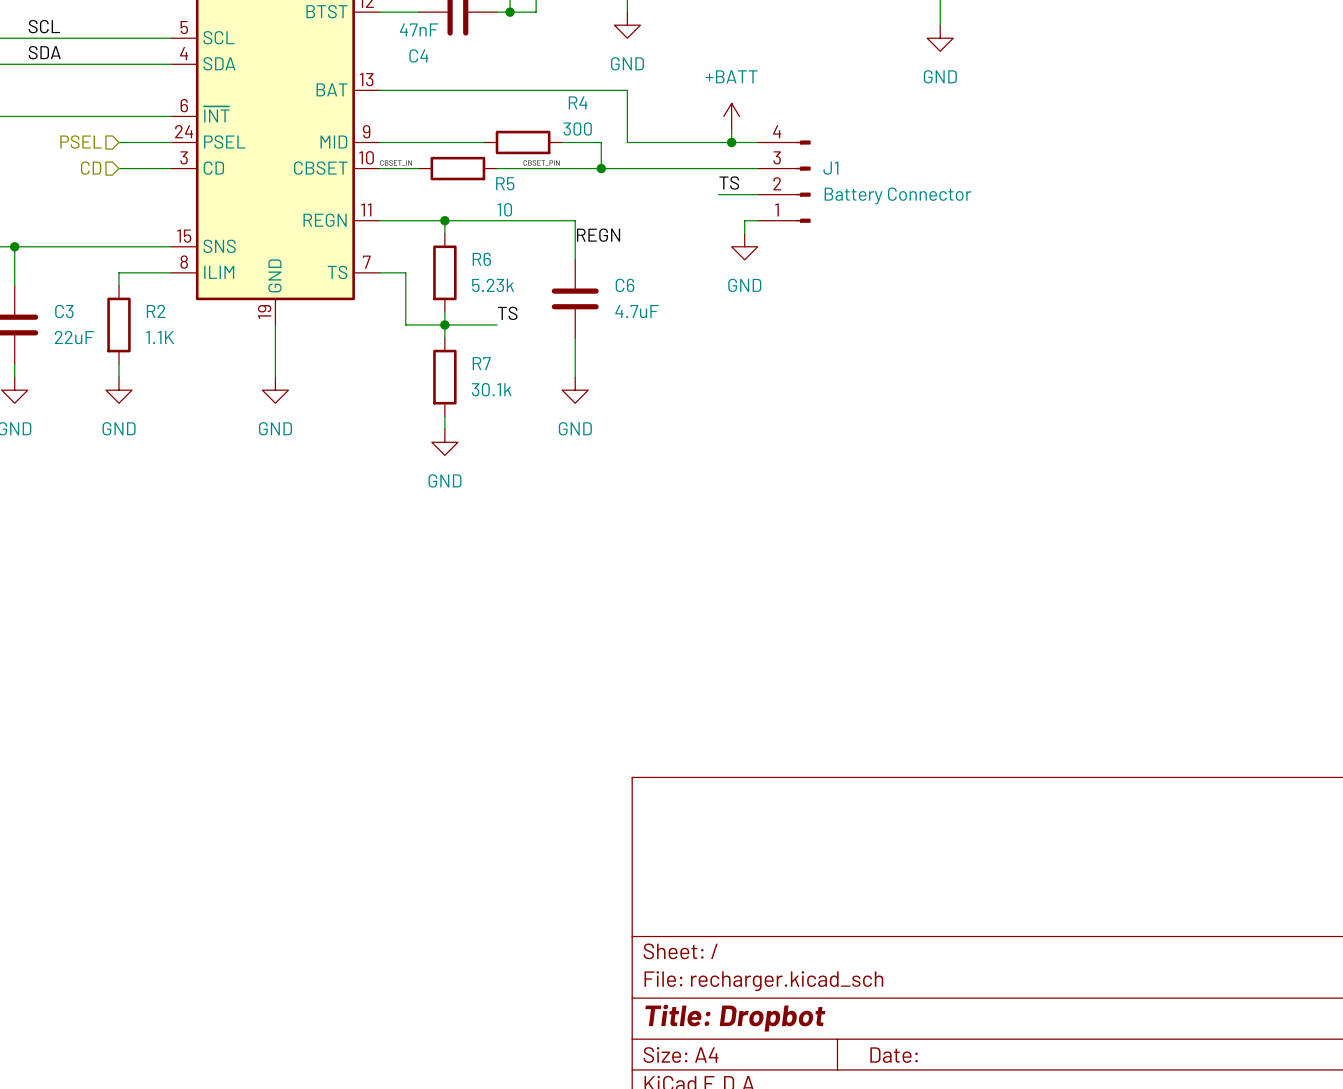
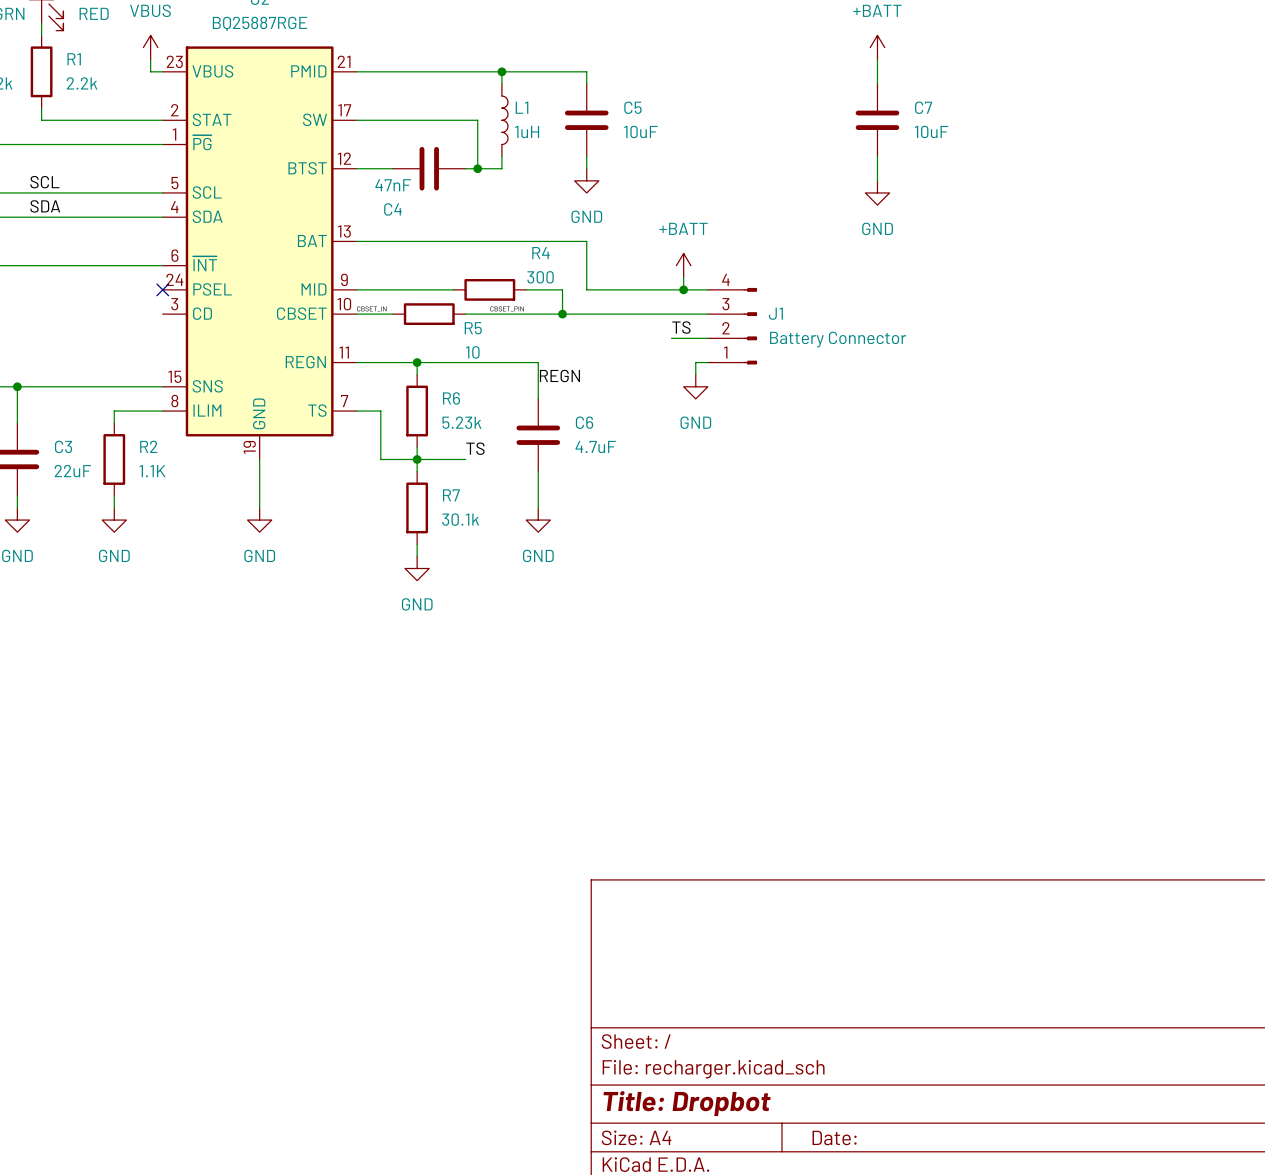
hierarchical label: PSEL (81, 142) -> none
wire: (118, 142) (171, 142) -> none
no-connect mark: none -> (162, 289)
hierarchical label: CD (91, 168) -> none
wire: (118, 168) (171, 168) -> none

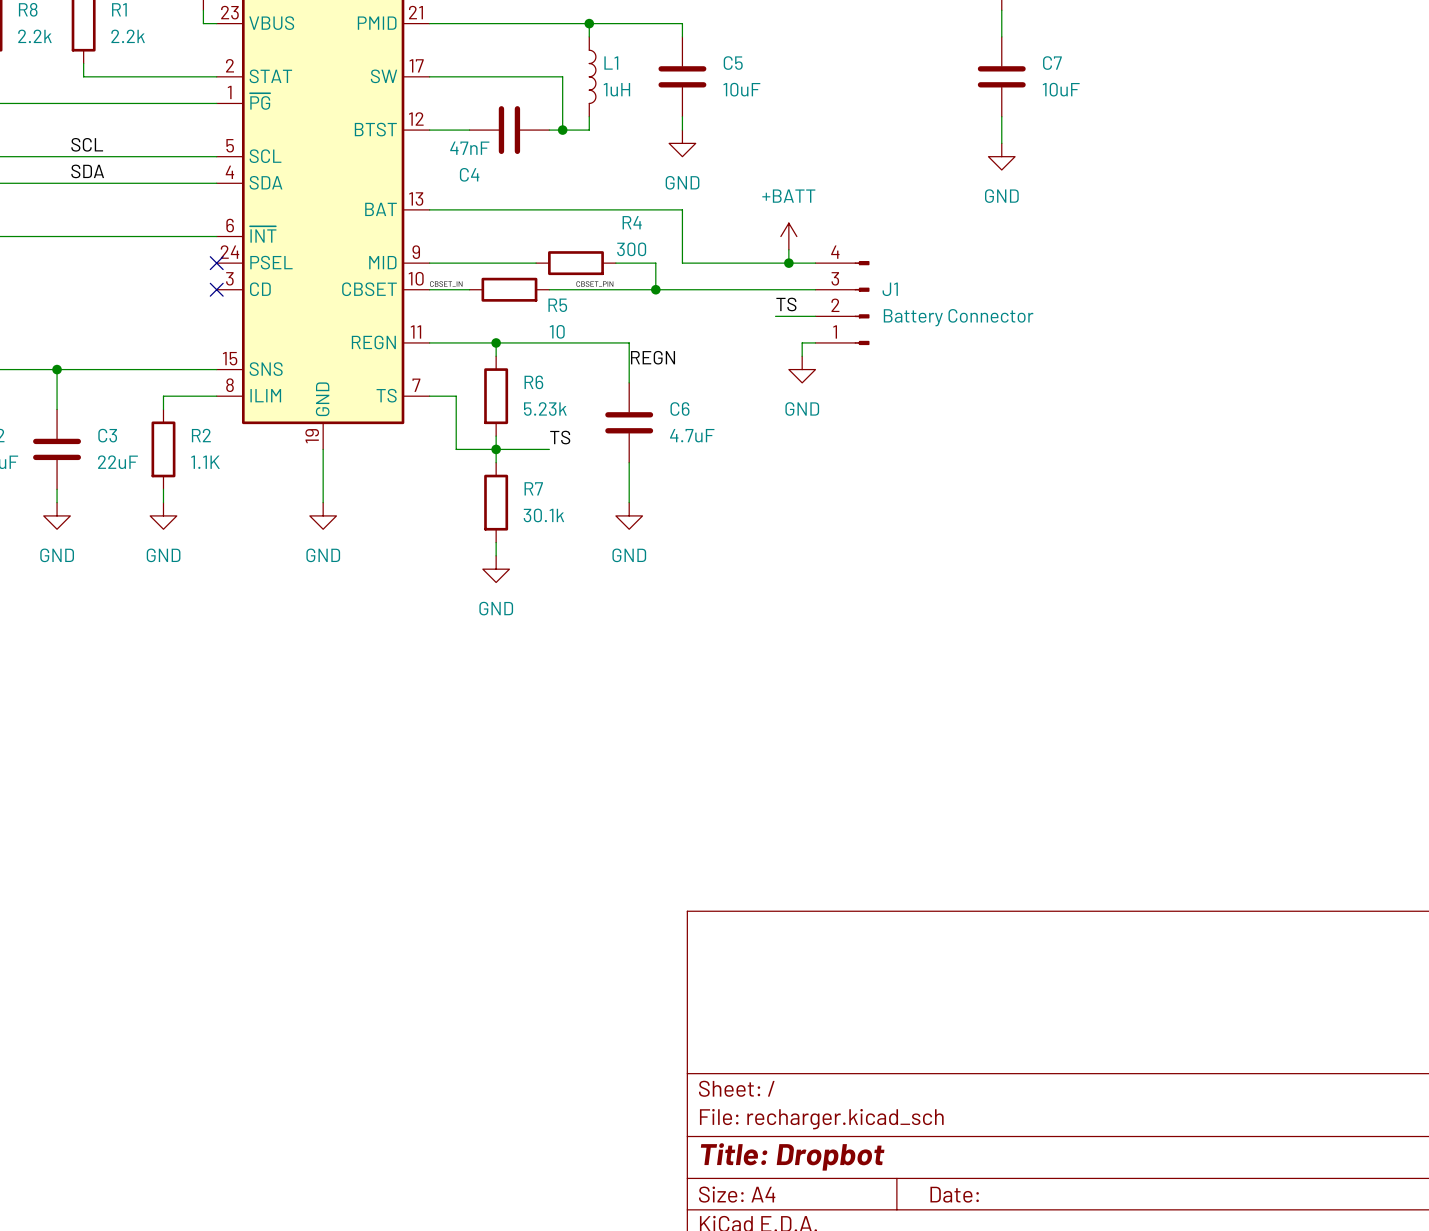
no-connect mark: none -> (216, 289)

